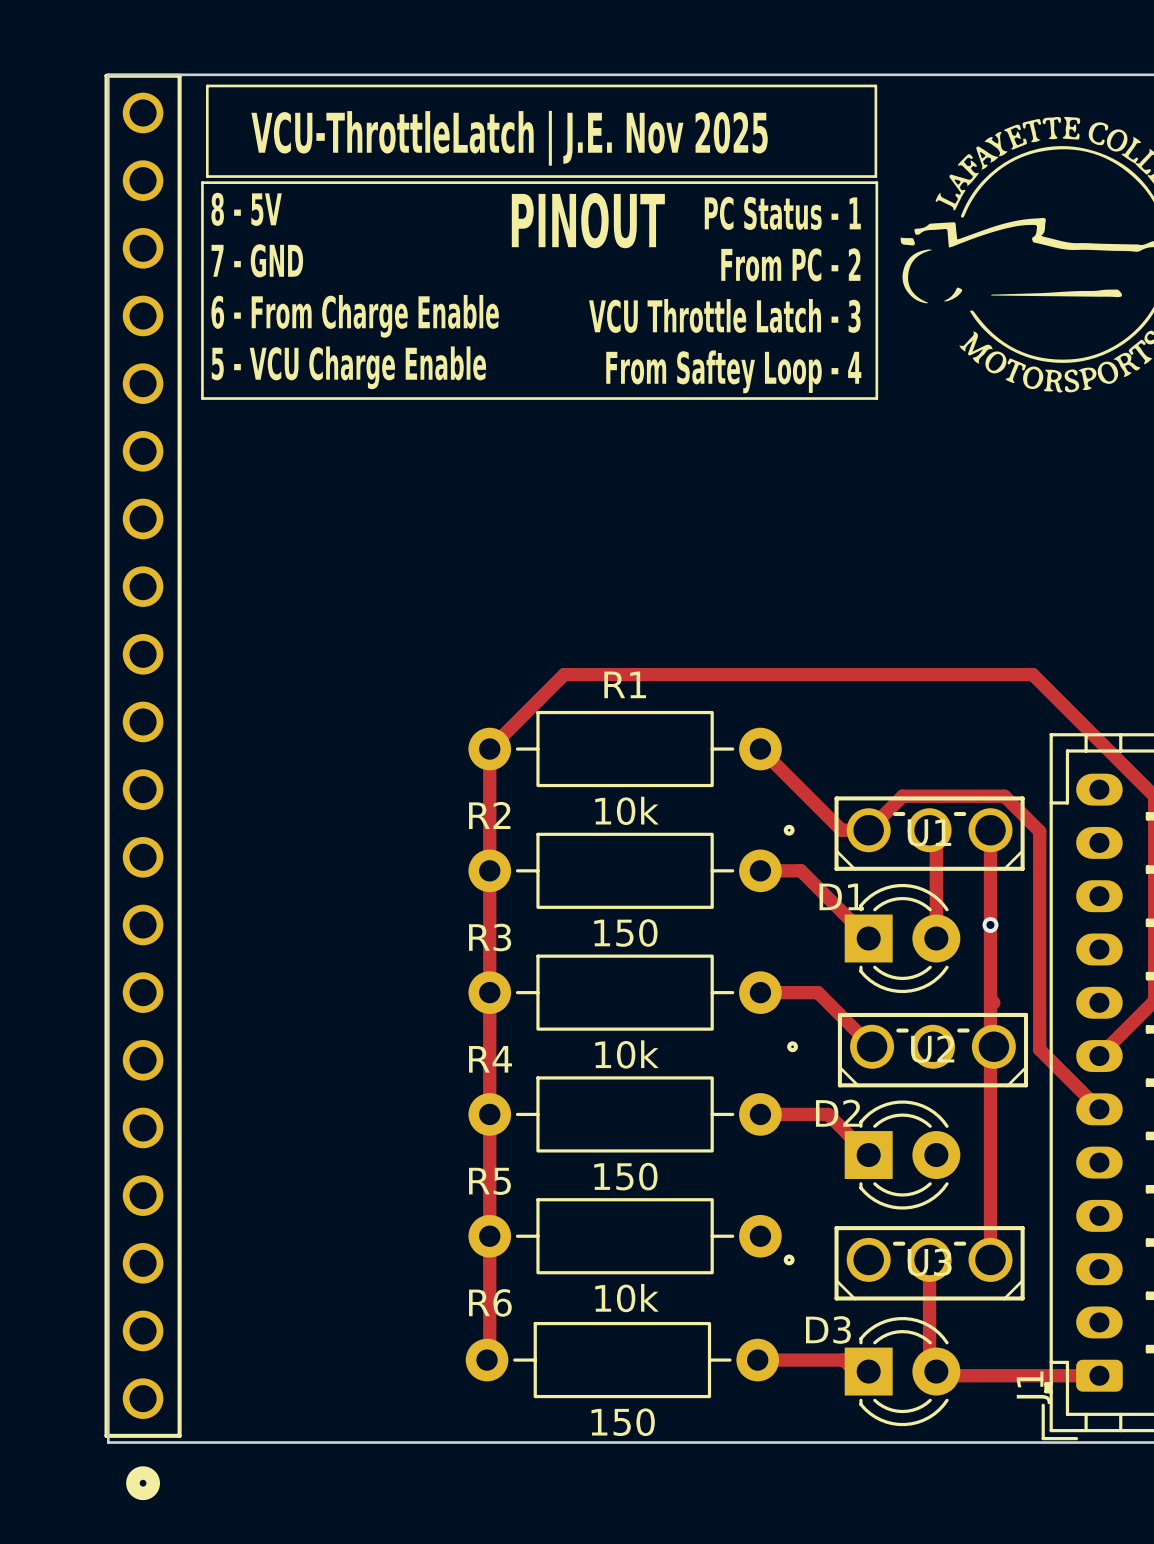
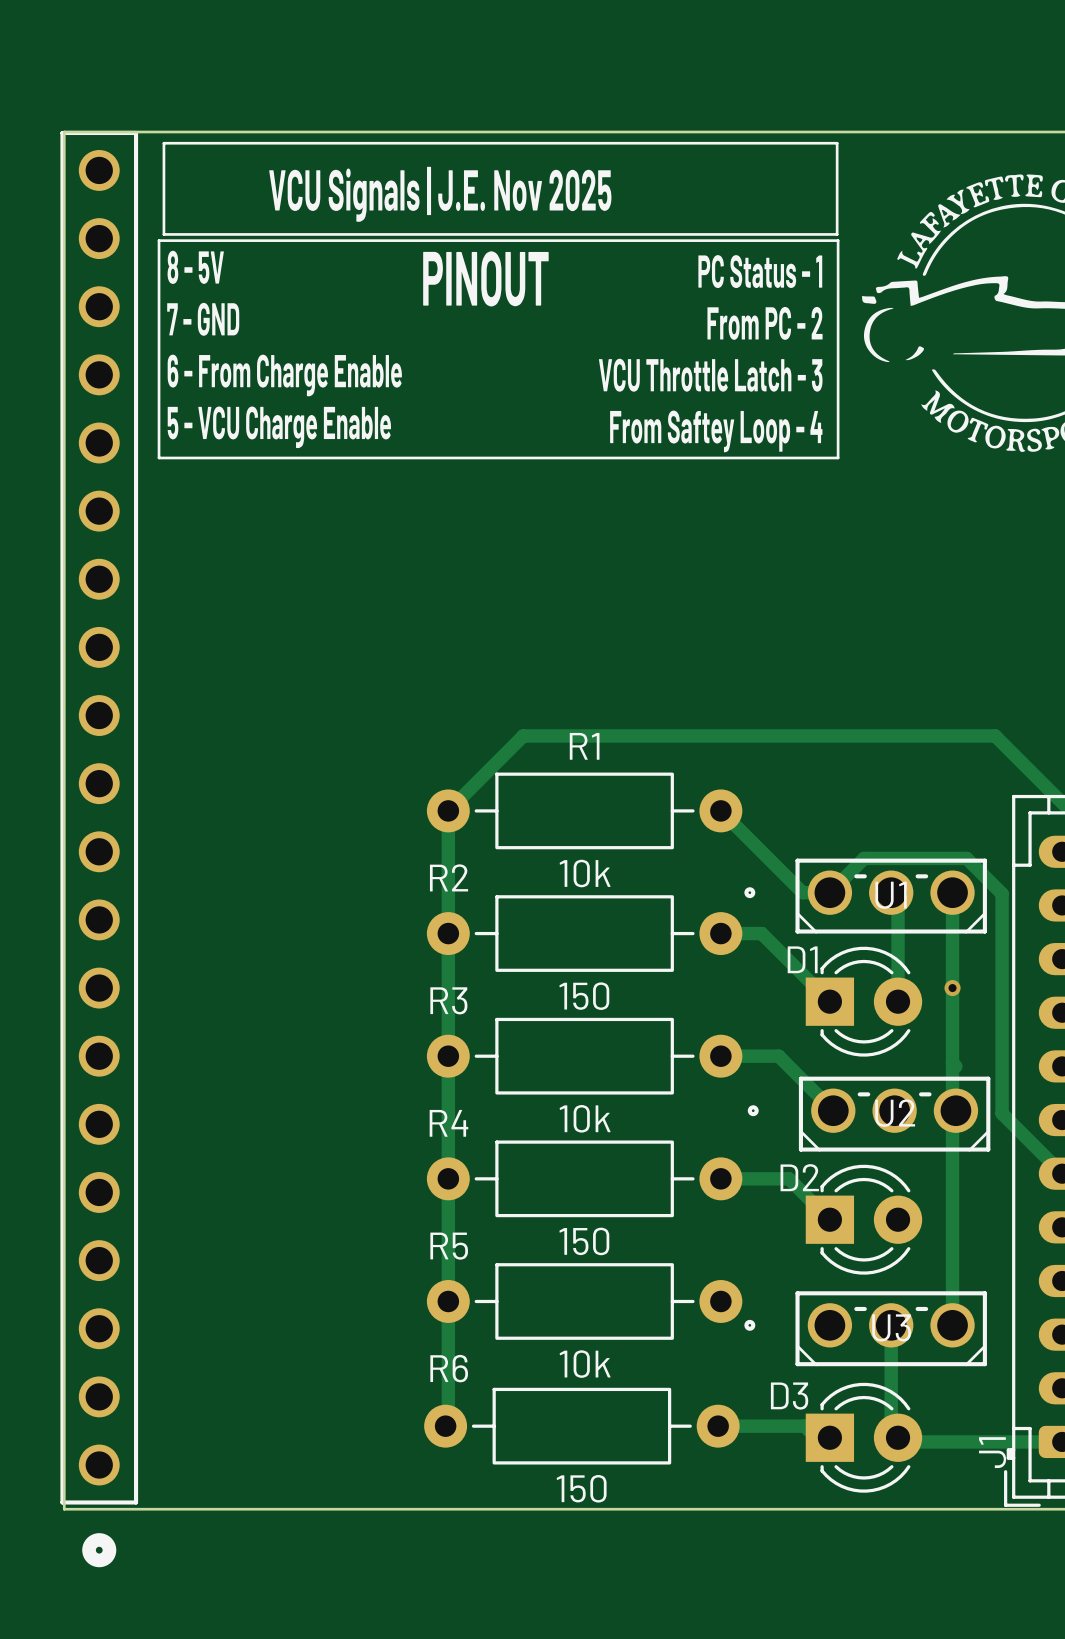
text: VCU-ThrottleLatch | J.E. Nov 2025 (509, 138) -> VCU Signals | J.E. Nov 2025 (440, 194)
text position: PINOUT (588, 220) -> PINOUT (485, 278)

